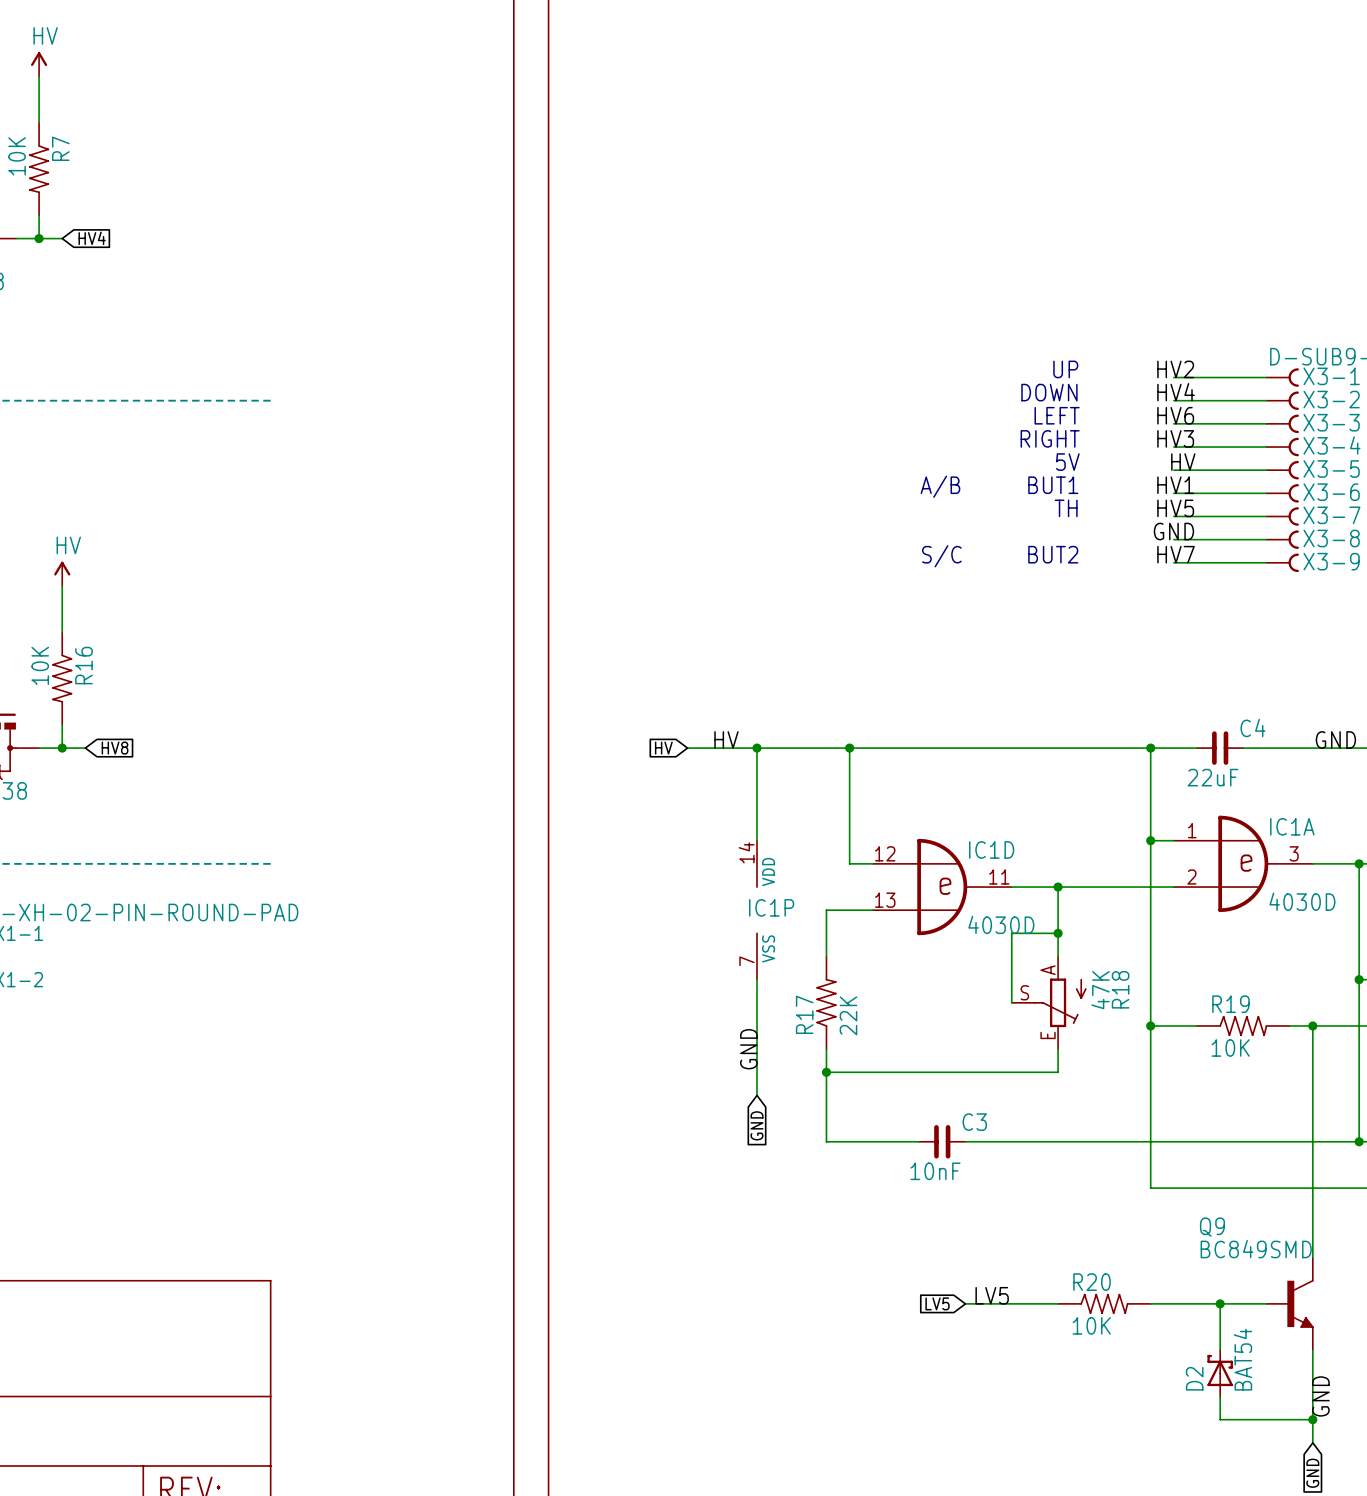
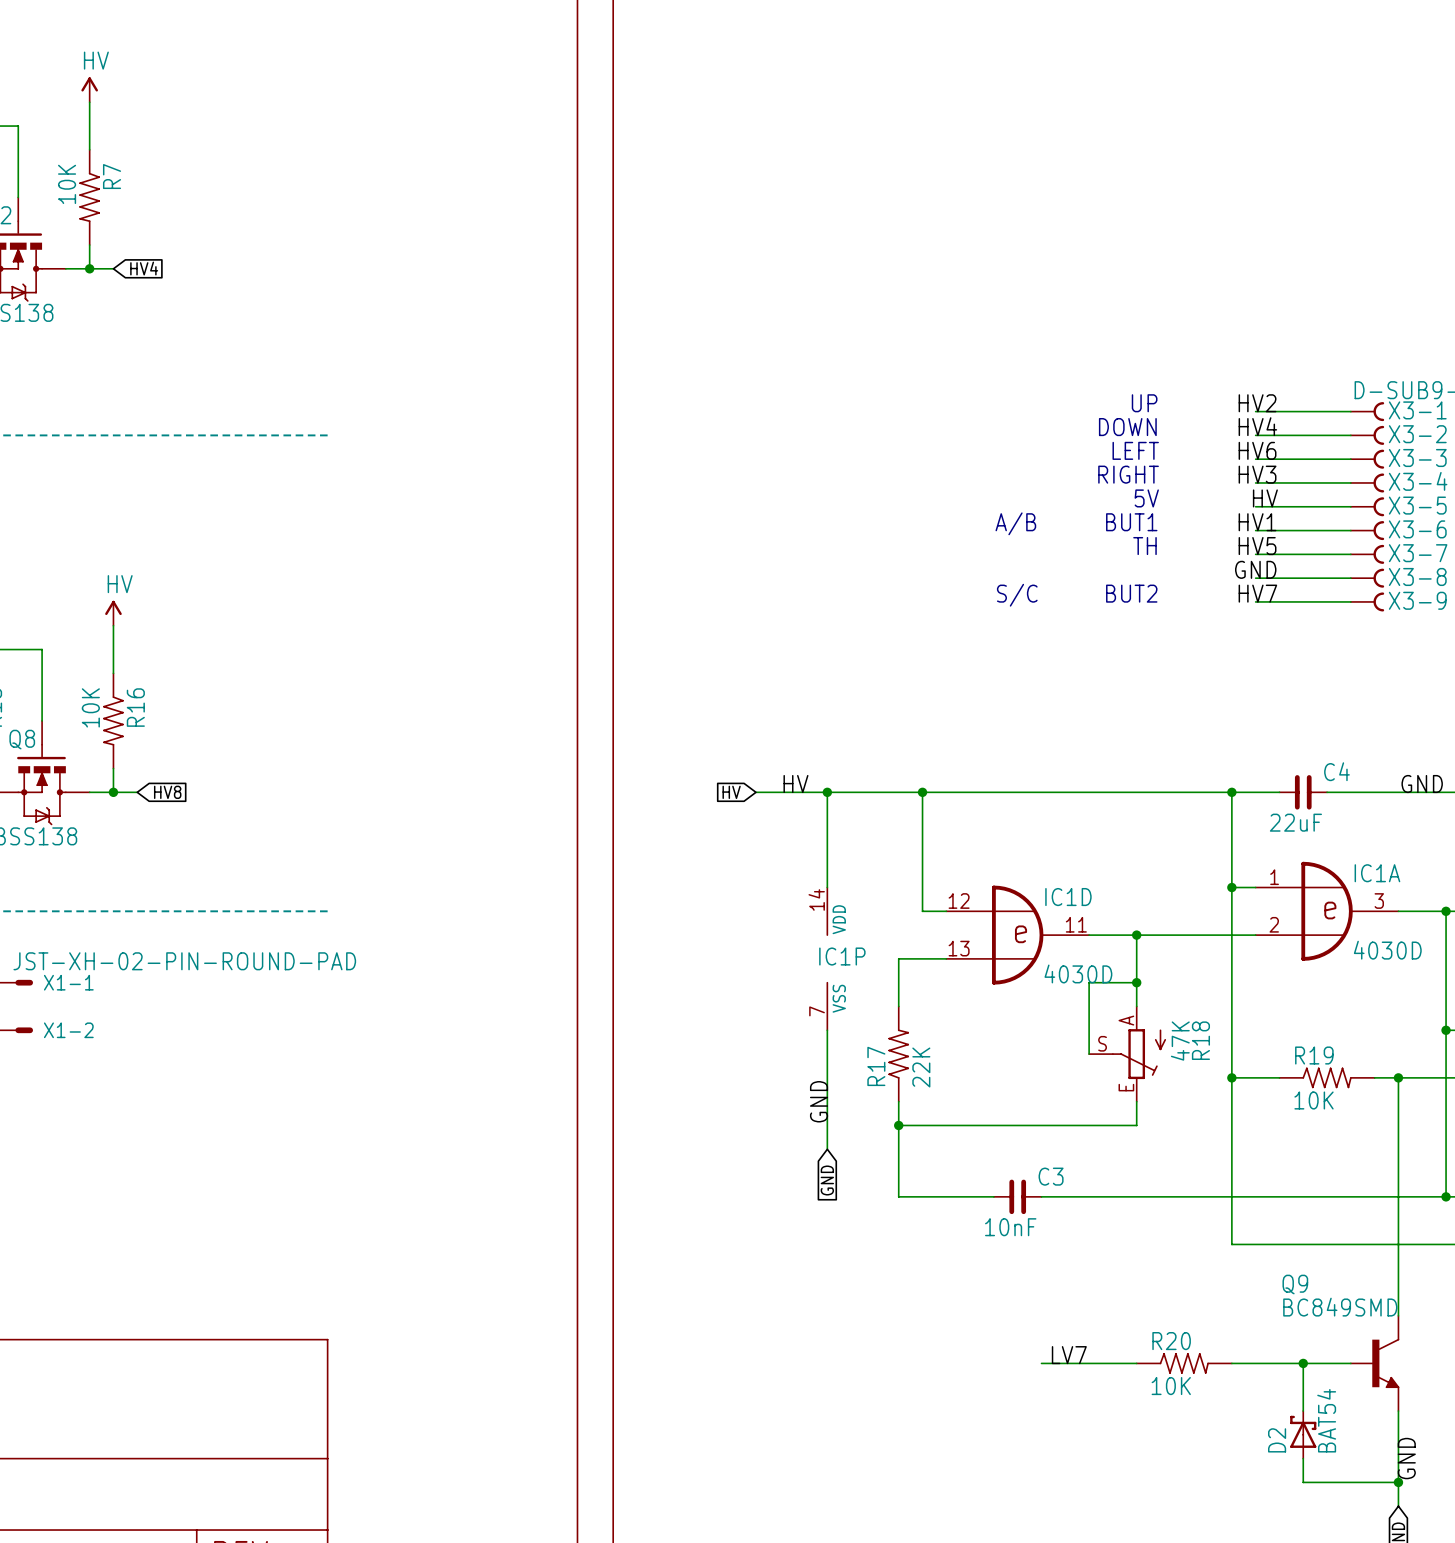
label: LV5 (992, 1295) -> LV7 (1069, 1355)
global label: LV5 (937, 1303) -> none

